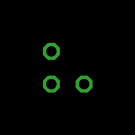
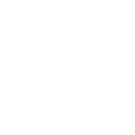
part: (67, 67) -> none

